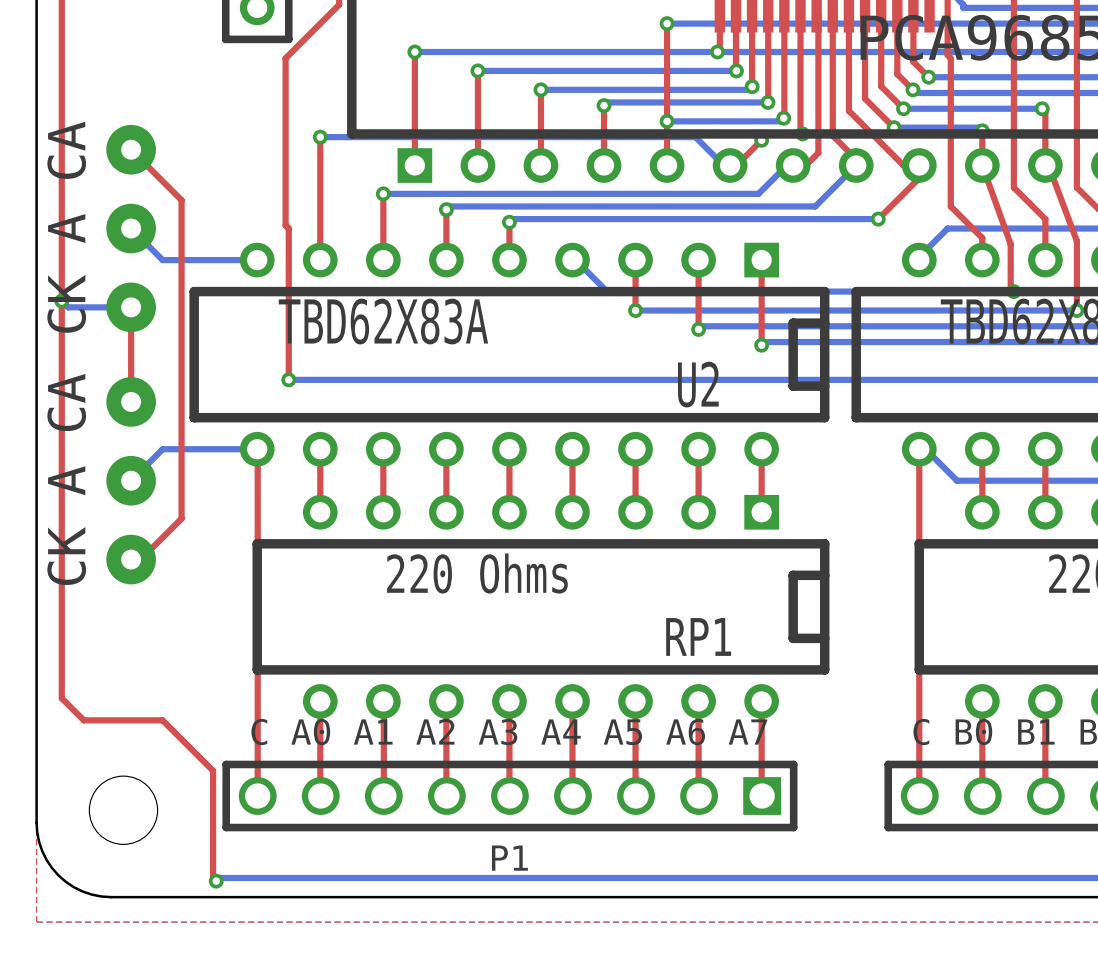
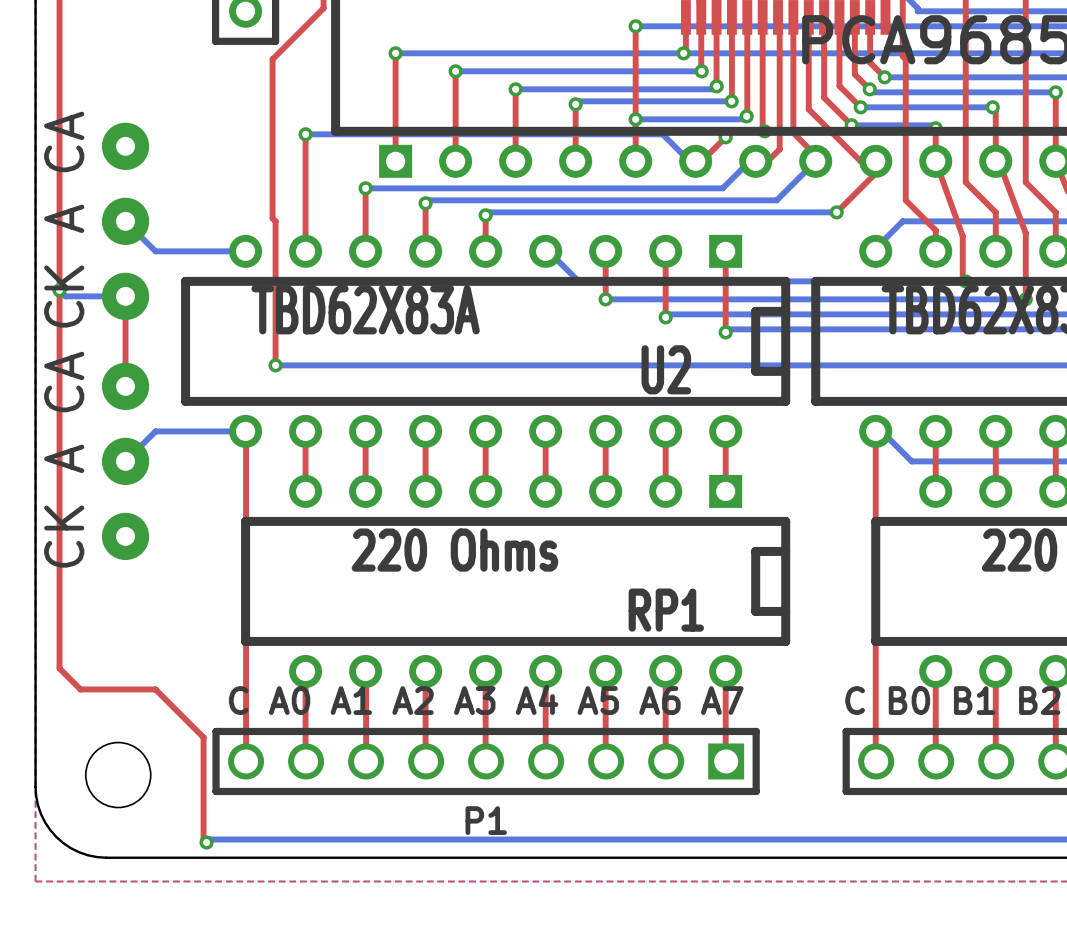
top track: (131, 149) (181, 200) (181, 518) (140, 559) (131, 559) -> none

